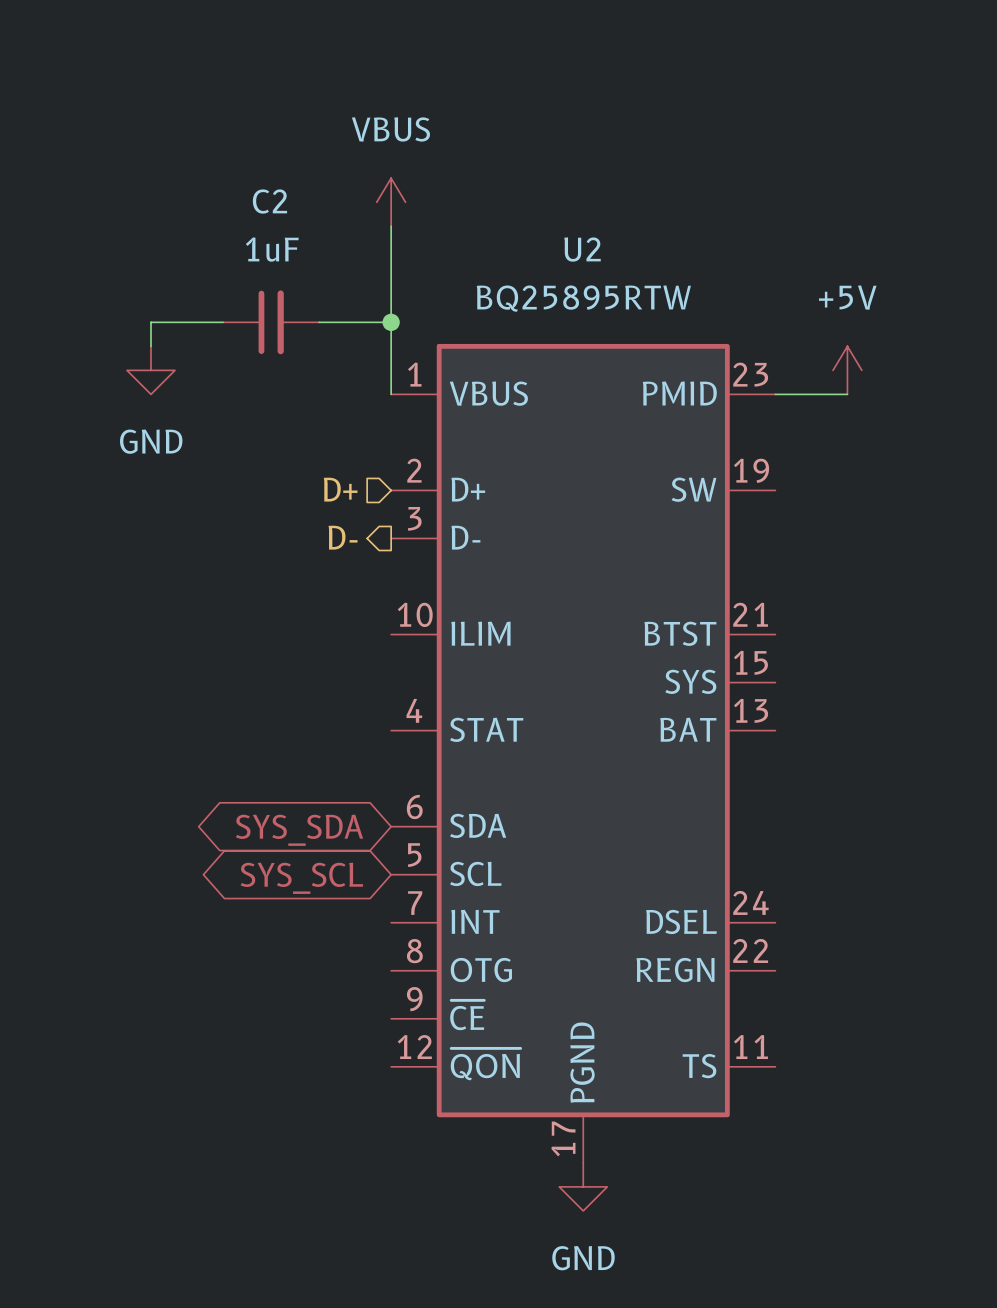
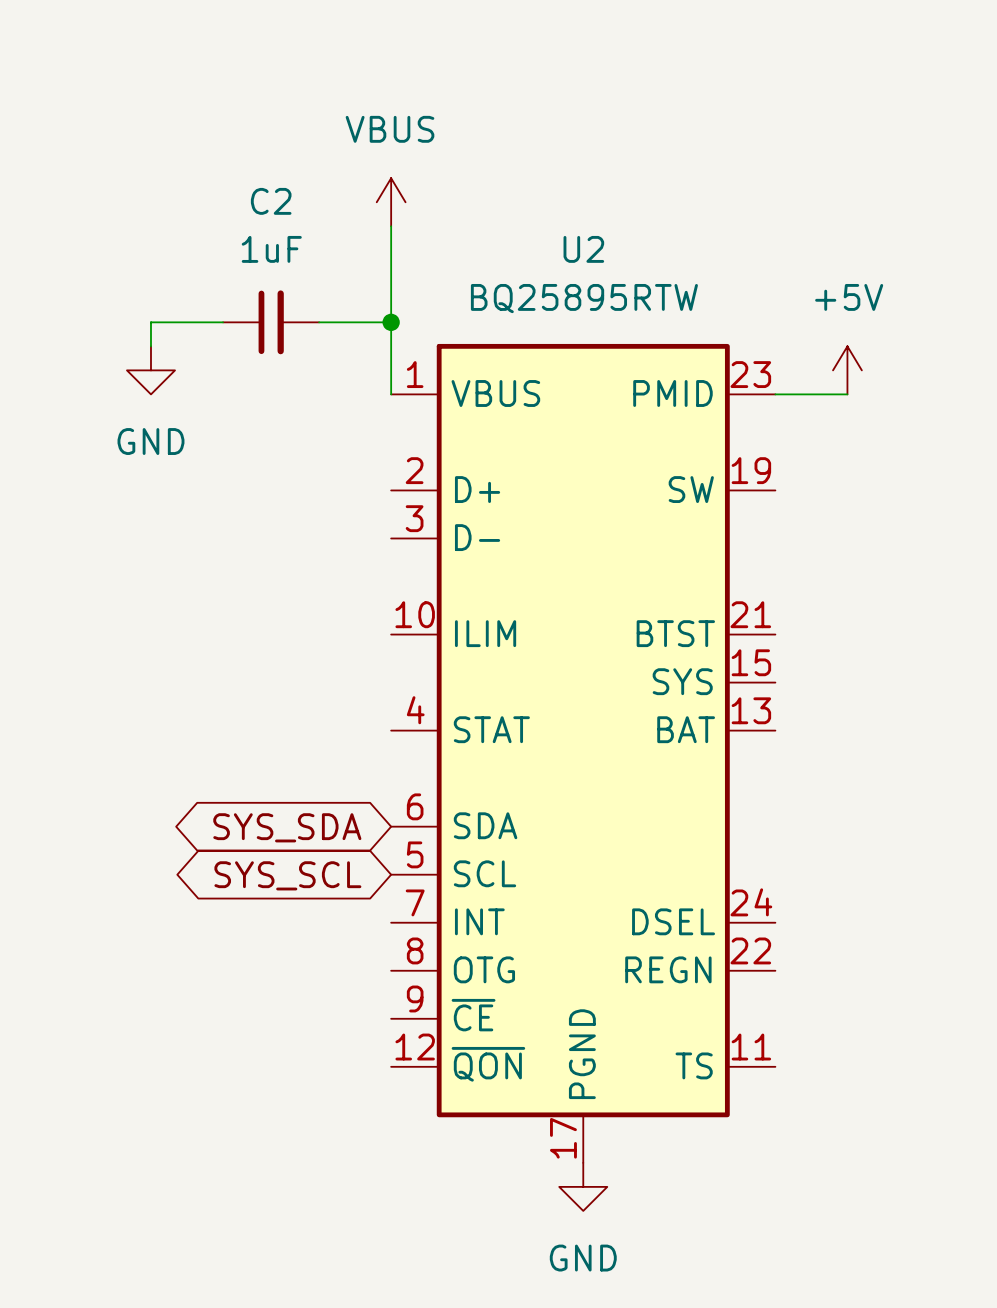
hierarchical label: D+ (340, 489) -> none
hierarchical label: D- (343, 537) -> none

